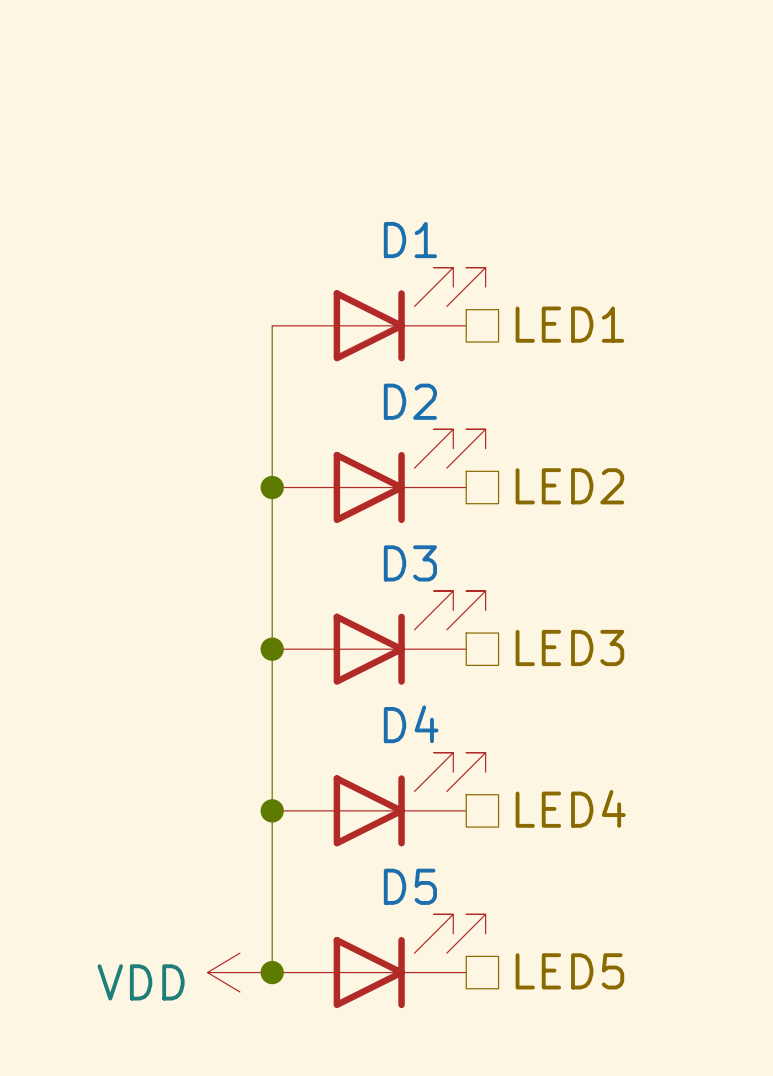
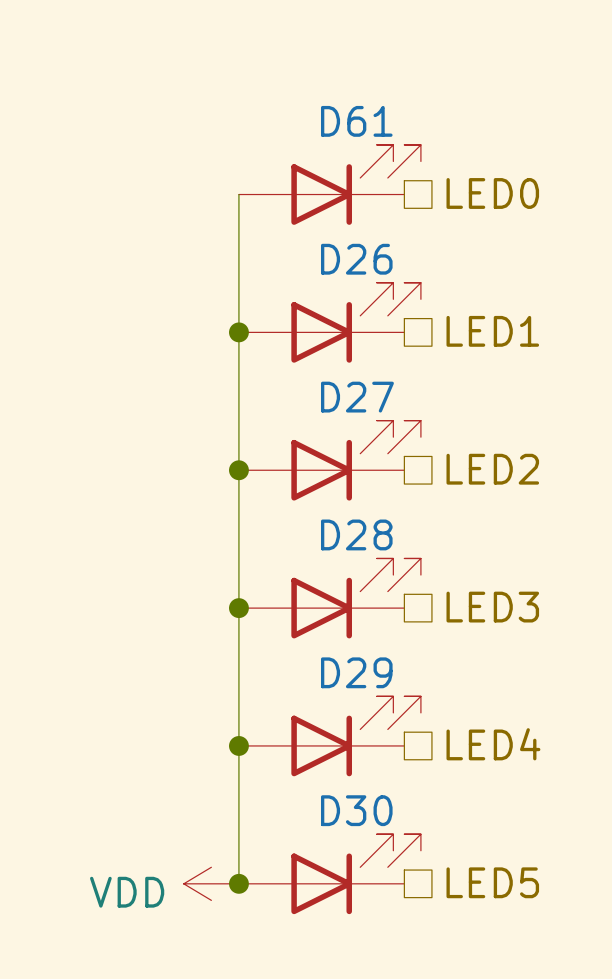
D61: none -> (329, 184)
hierarchical label: none -> LED0 (492, 193)
wire: none -> (238, 194) (238, 332)
D1 name: D1 (410, 240) -> D26 (356, 259)
junction: none -> (238, 332)
D2 name: D2 (410, 401) -> D27 (357, 397)
D3 name: D3 (410, 563) -> D28 (356, 534)
D4 name: D4 (411, 724) -> D29 (356, 672)
D5 name: D5 (410, 886) -> D30 (356, 810)

